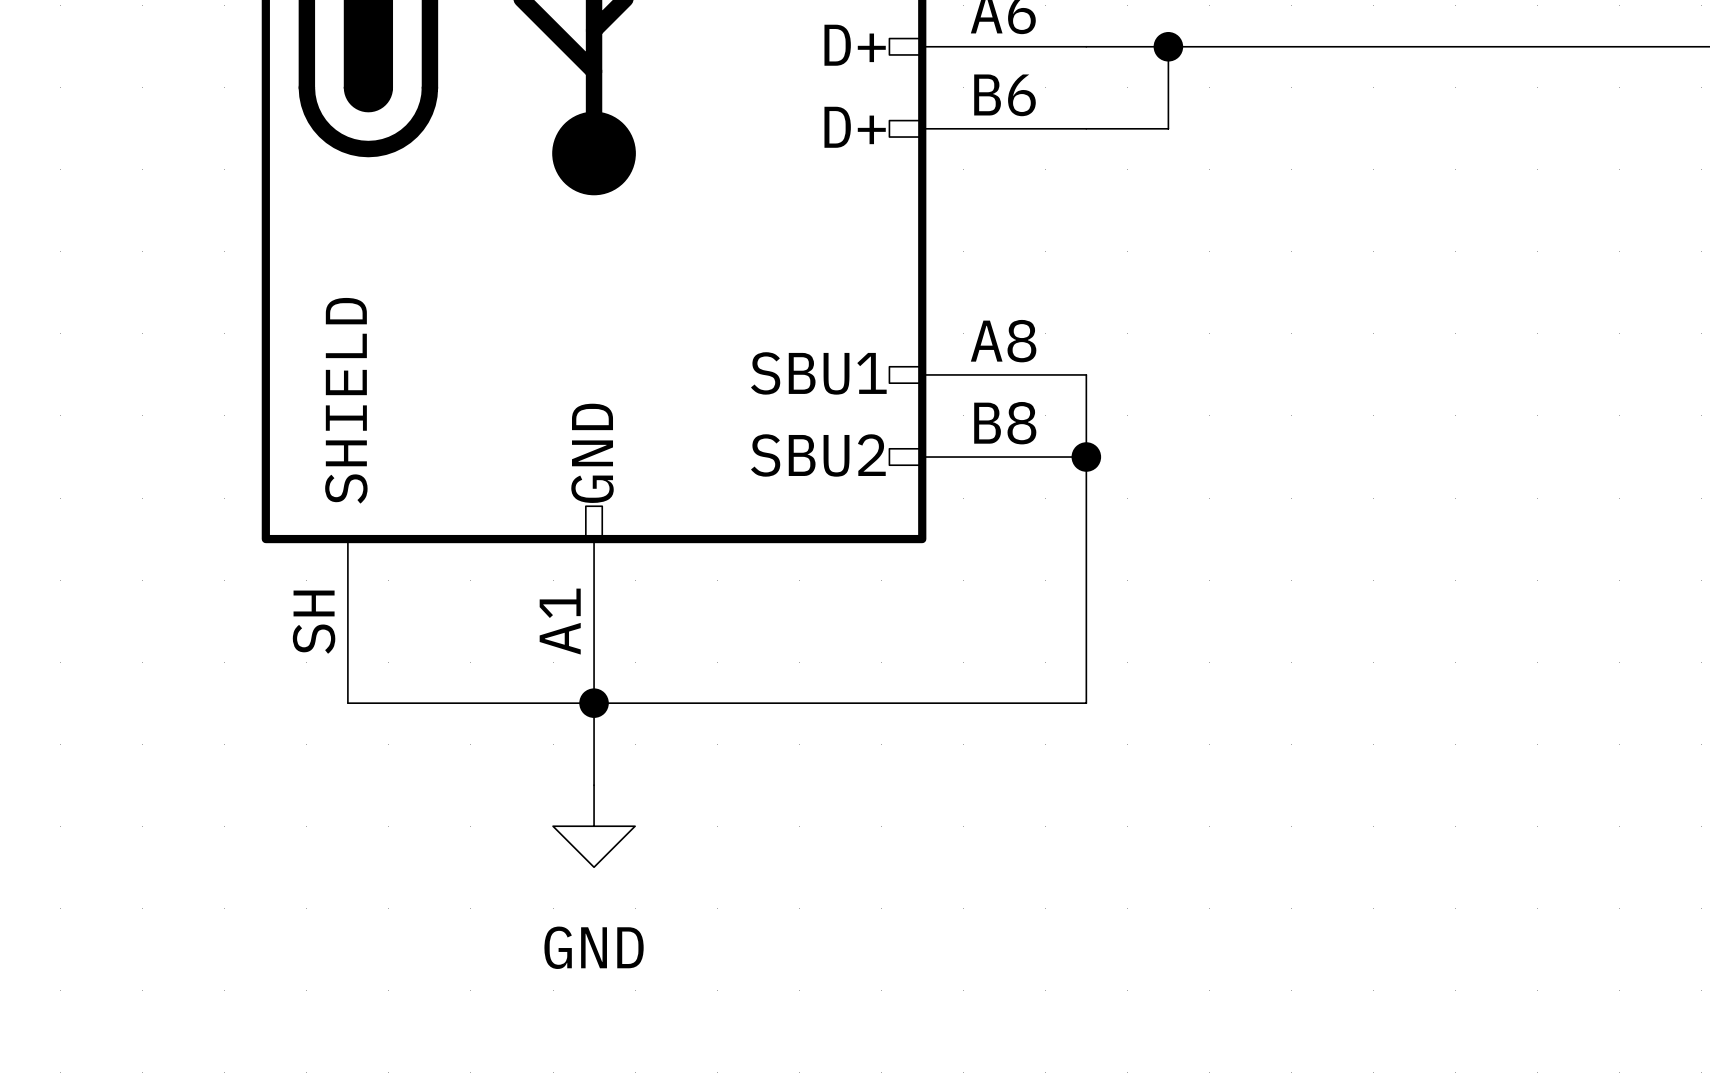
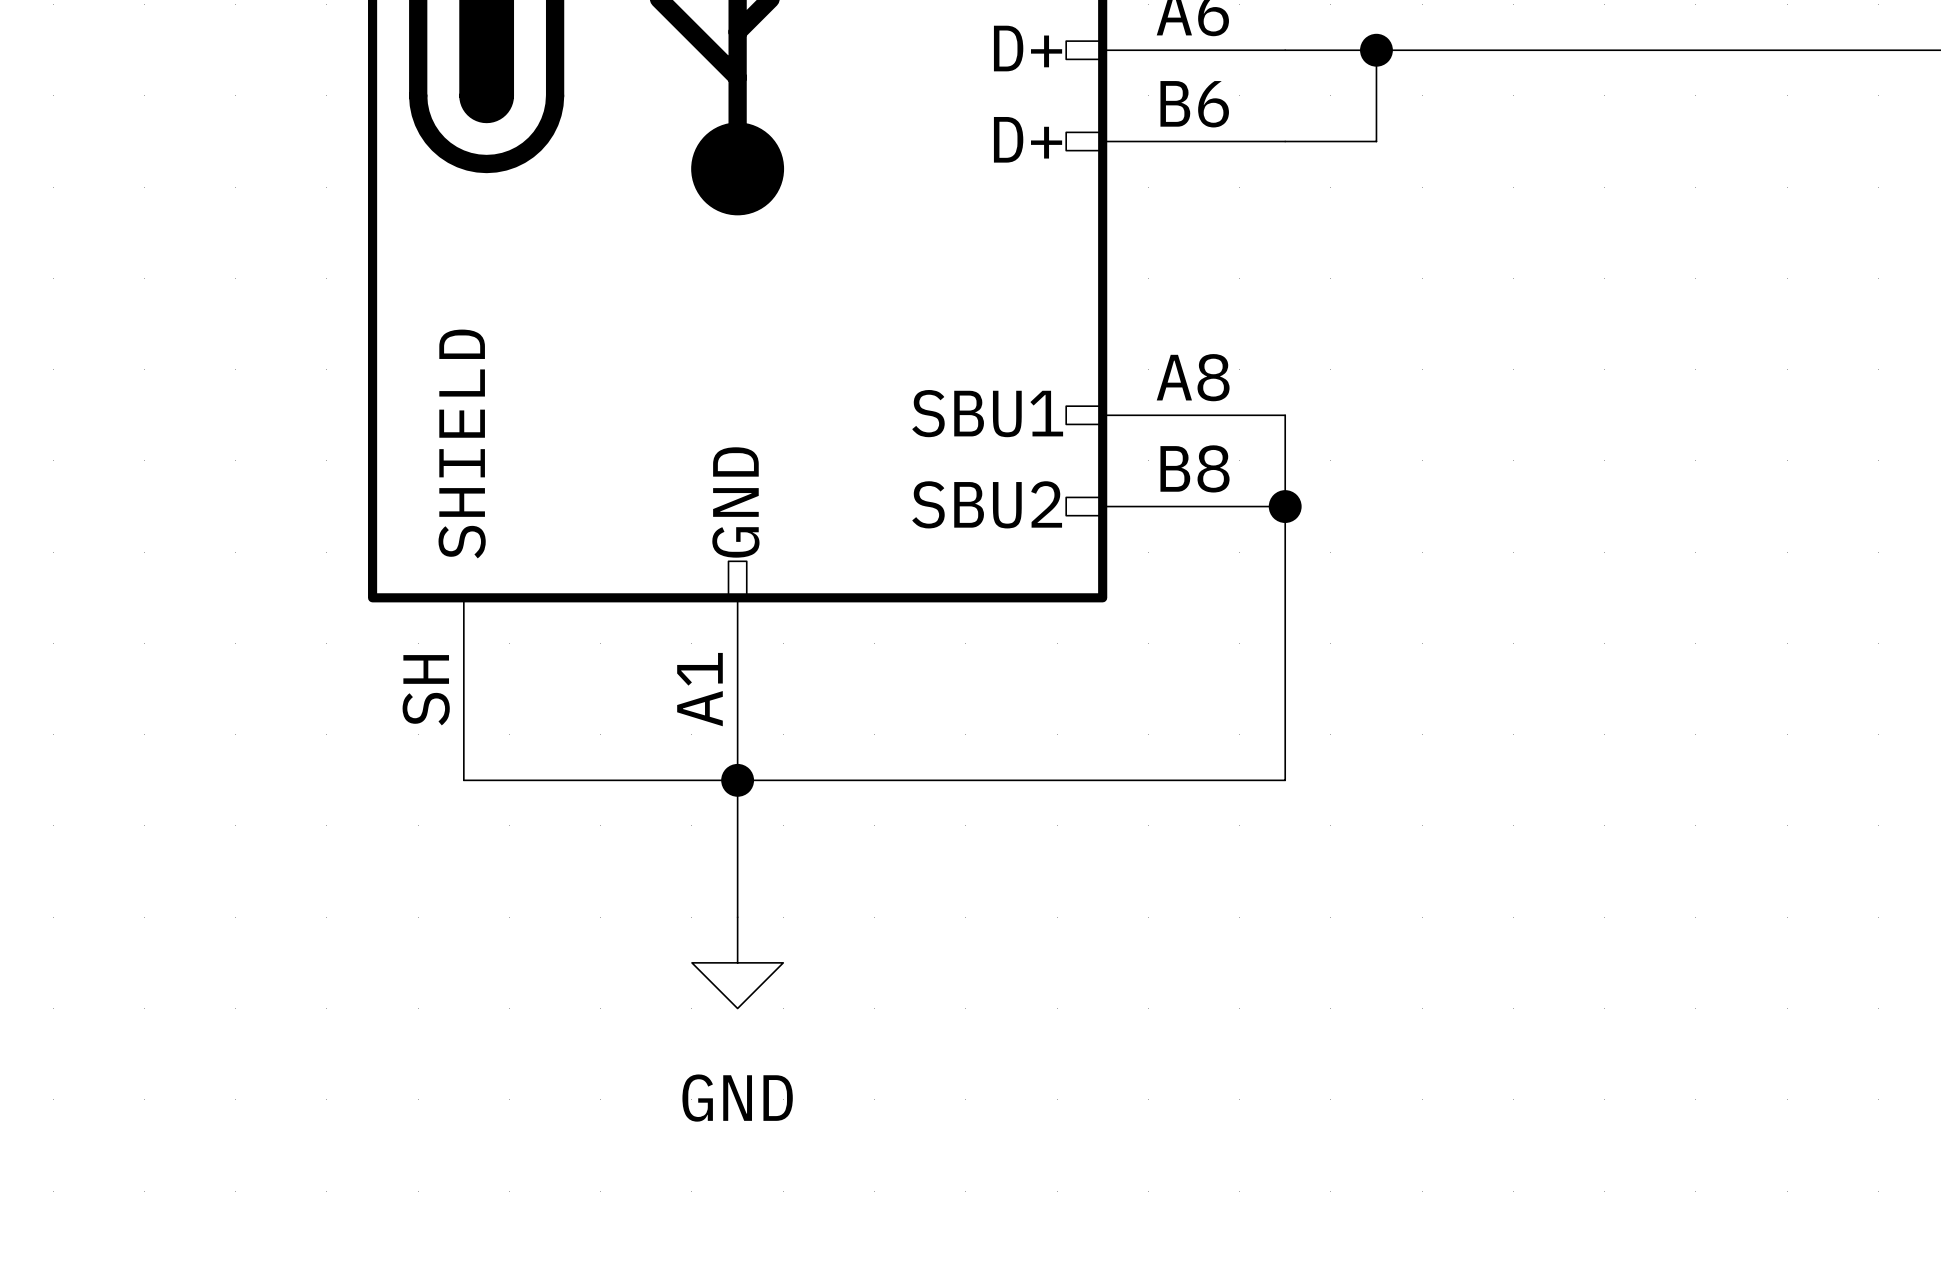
power symbol position: GND (594, 826) -> GND (737, 962)

